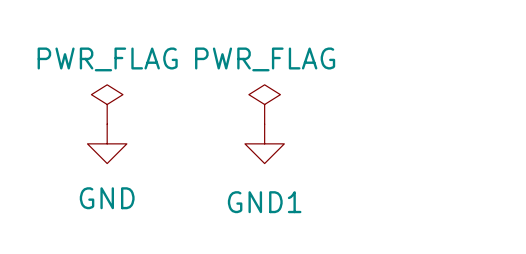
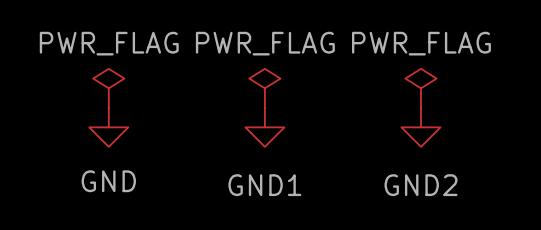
power symbol: none -> PWR_FLAG (421, 88)
power symbol: none -> GND2 (421, 127)

